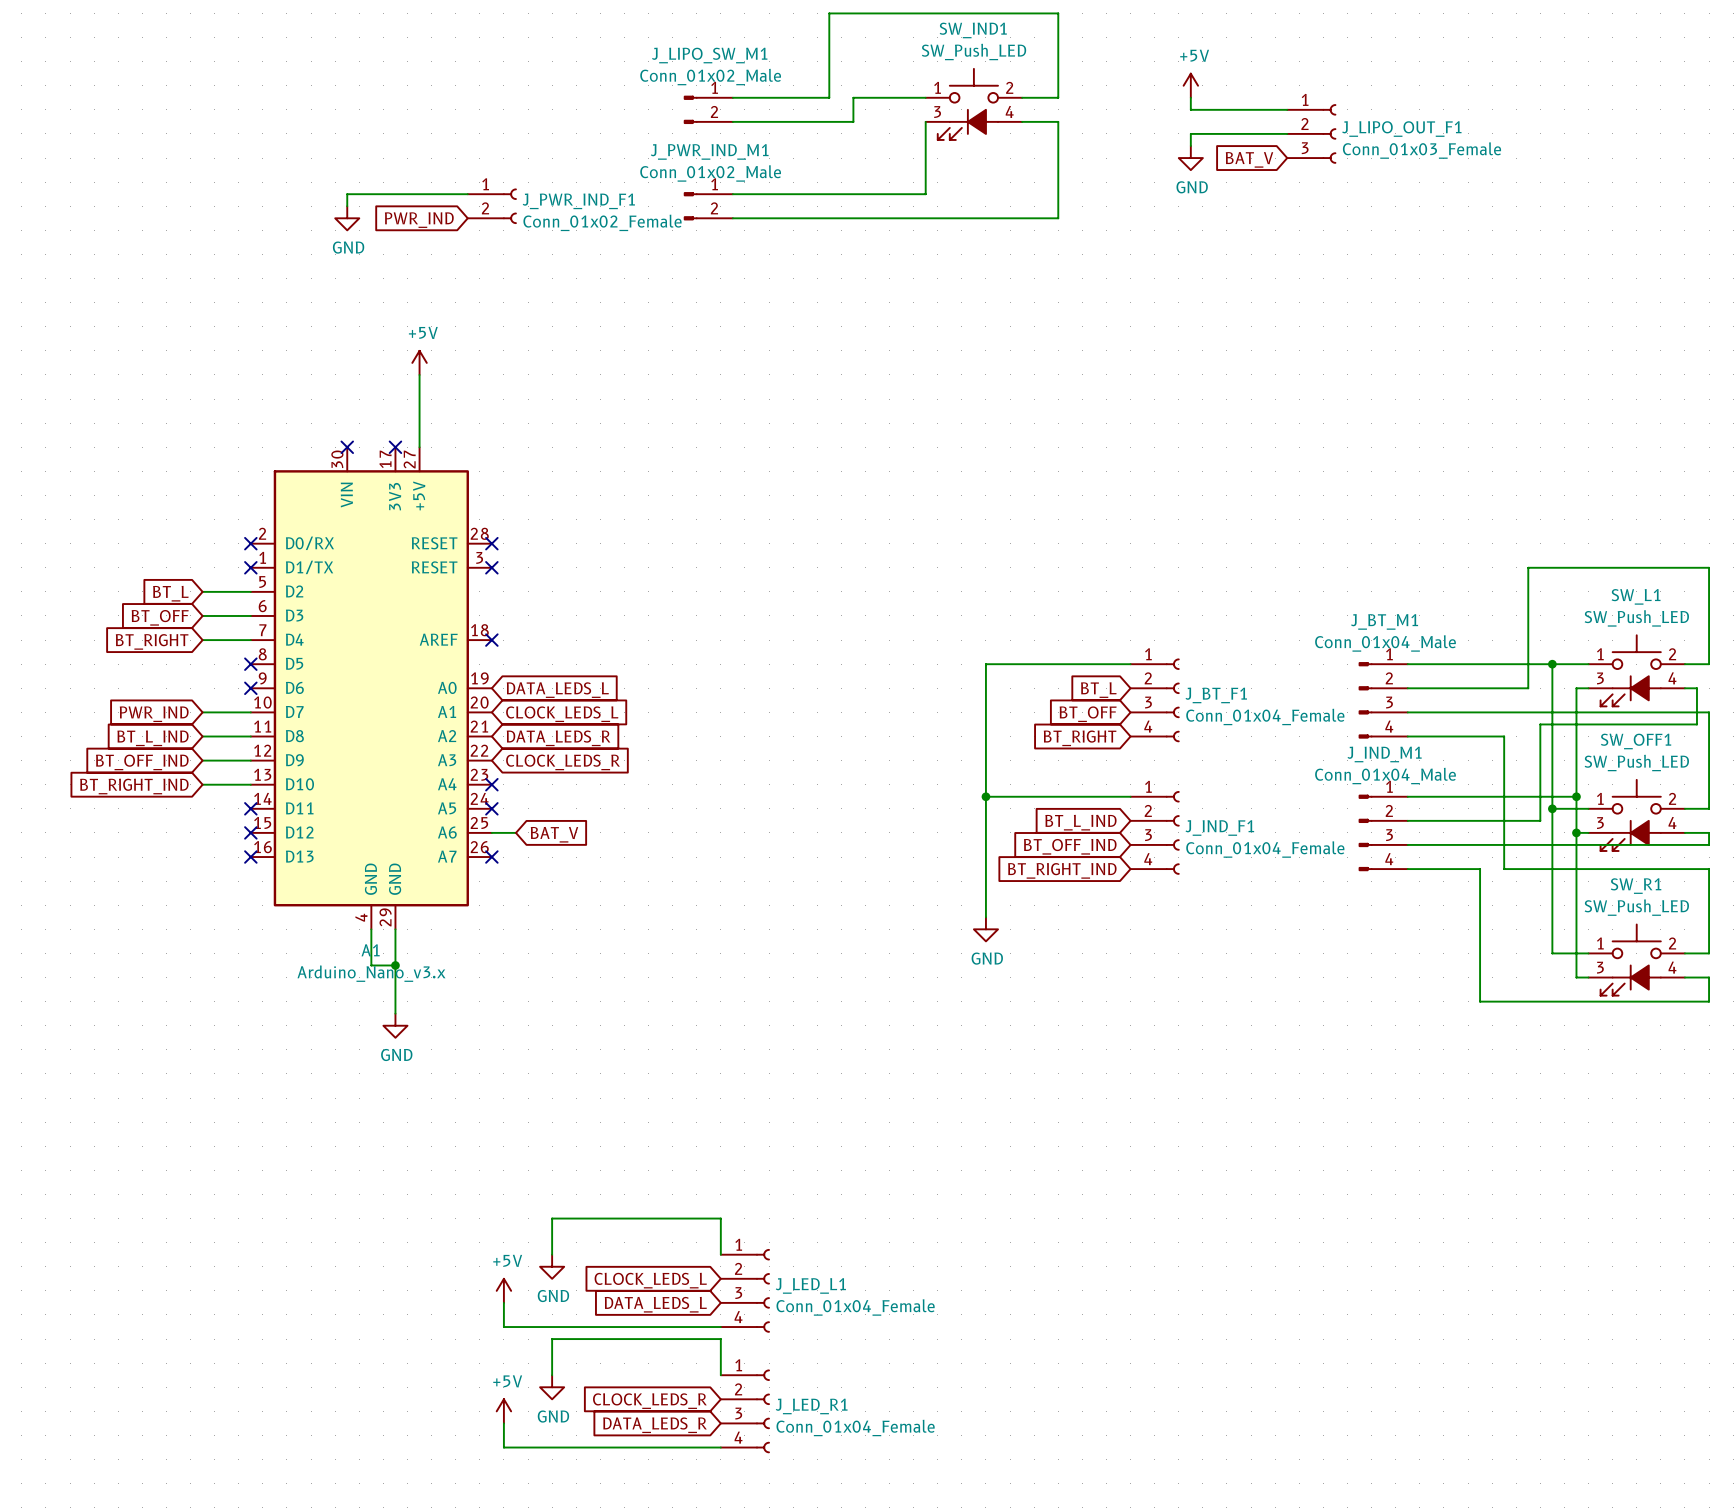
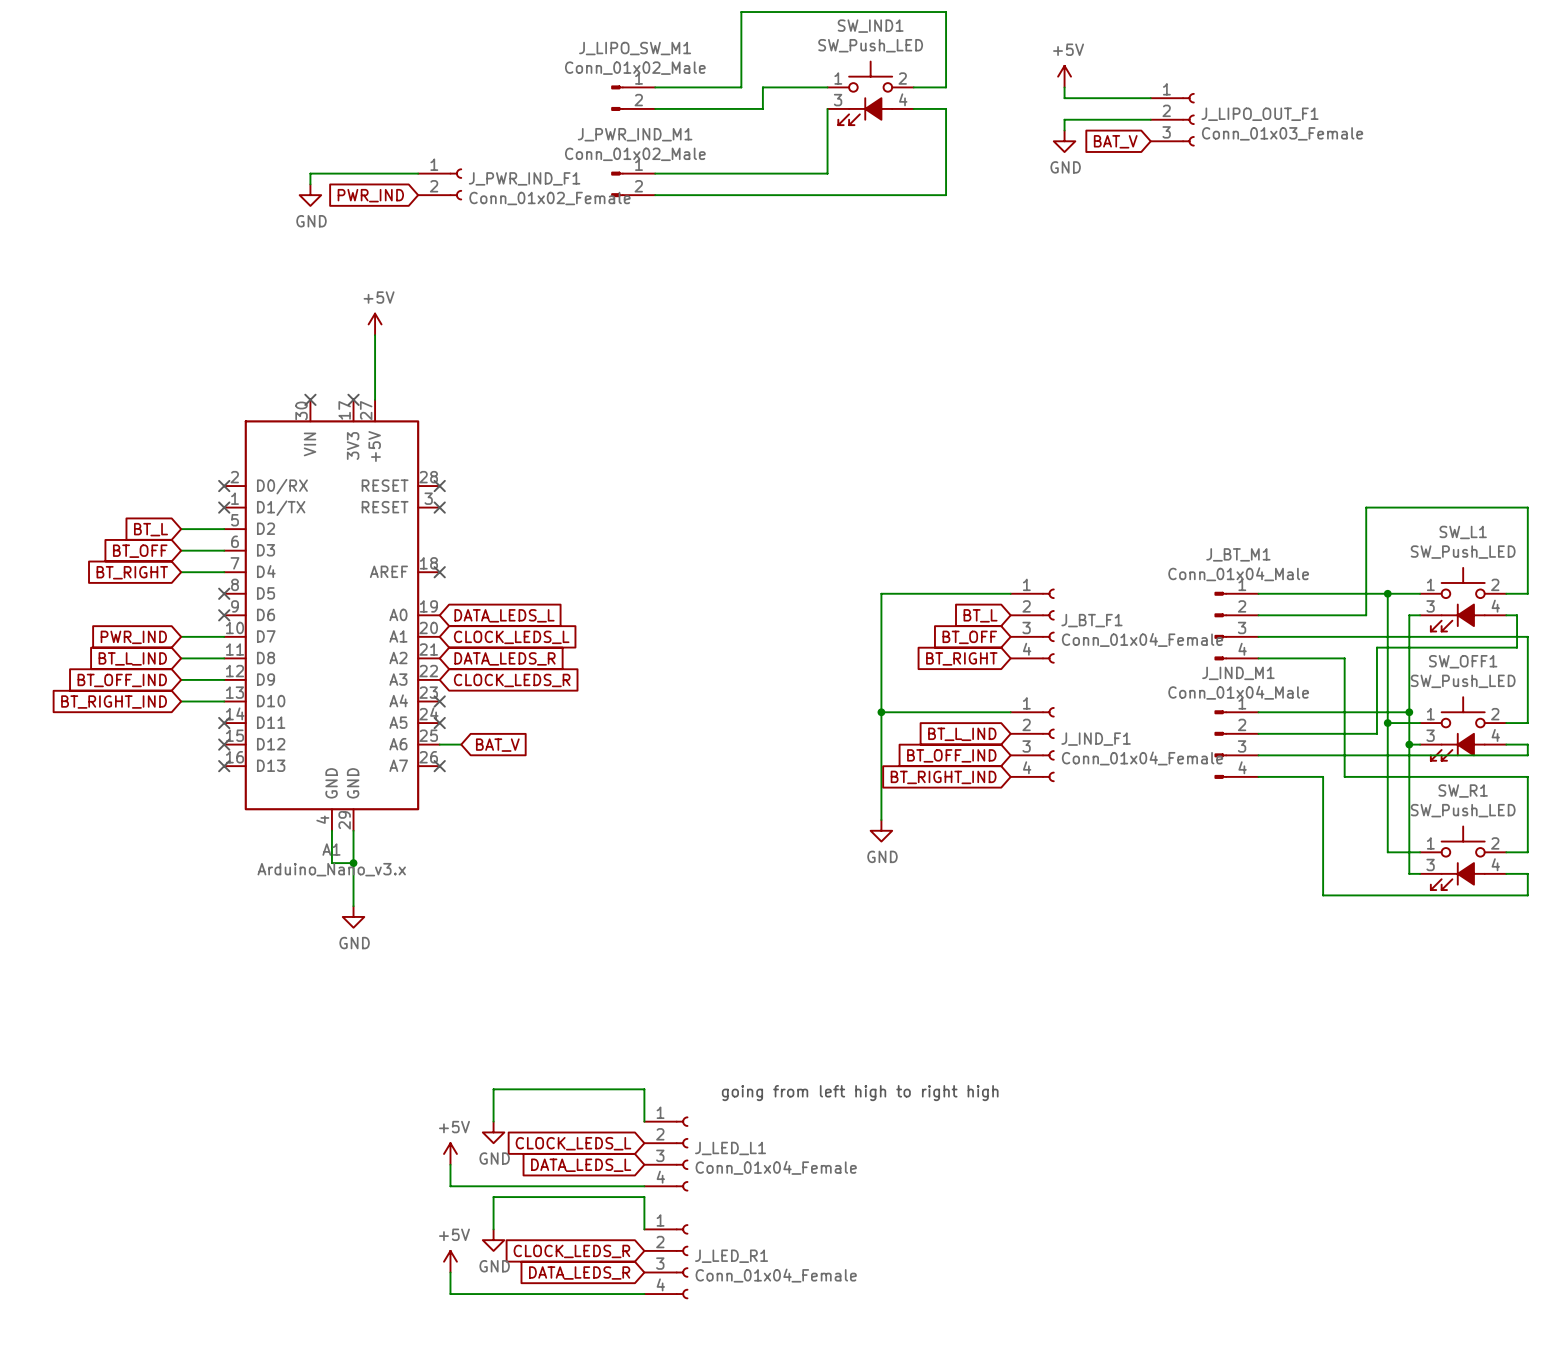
text: none -> going from left high to right high (860, 1093)

